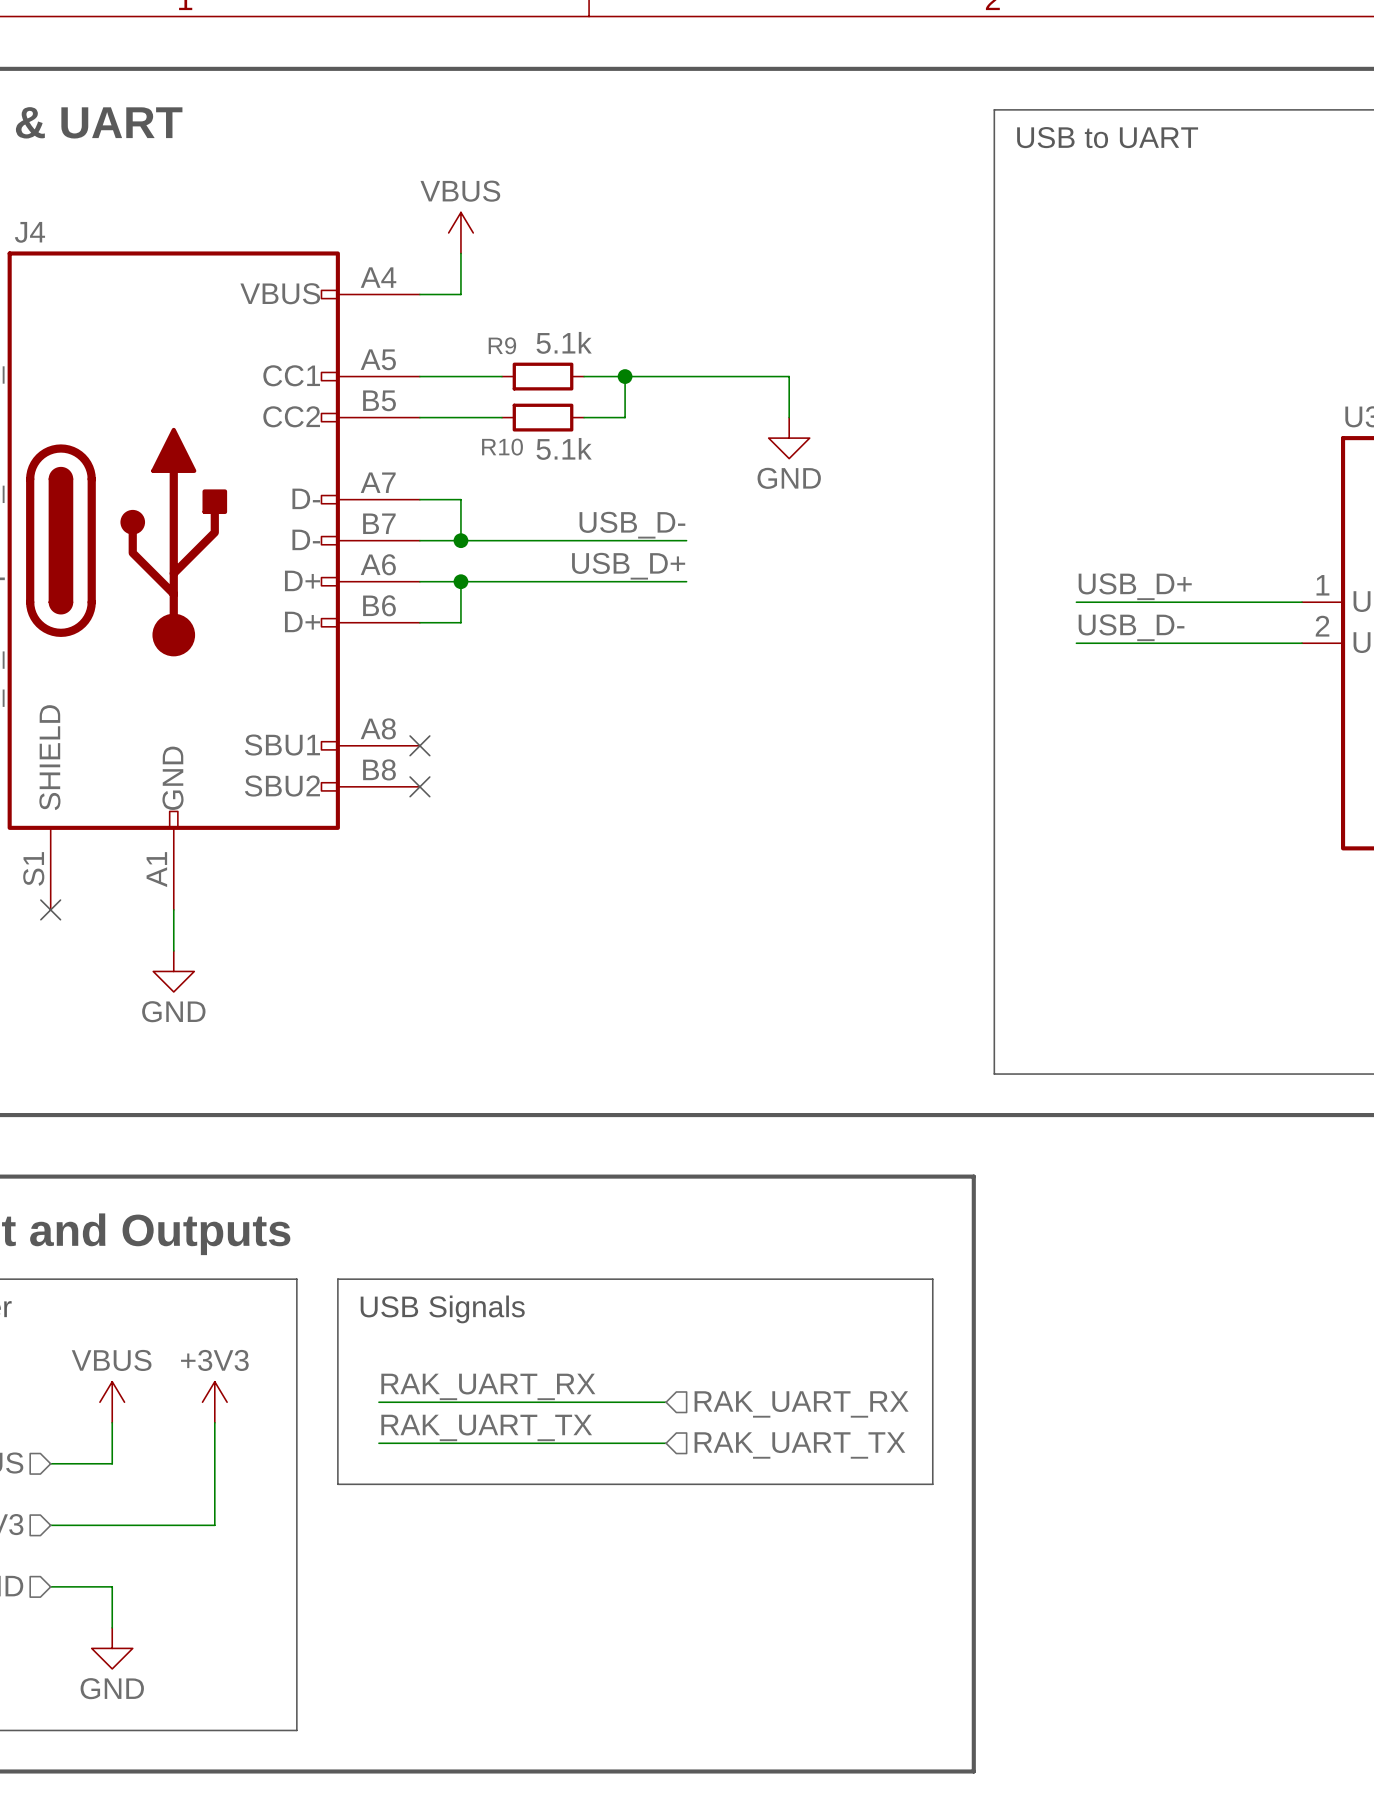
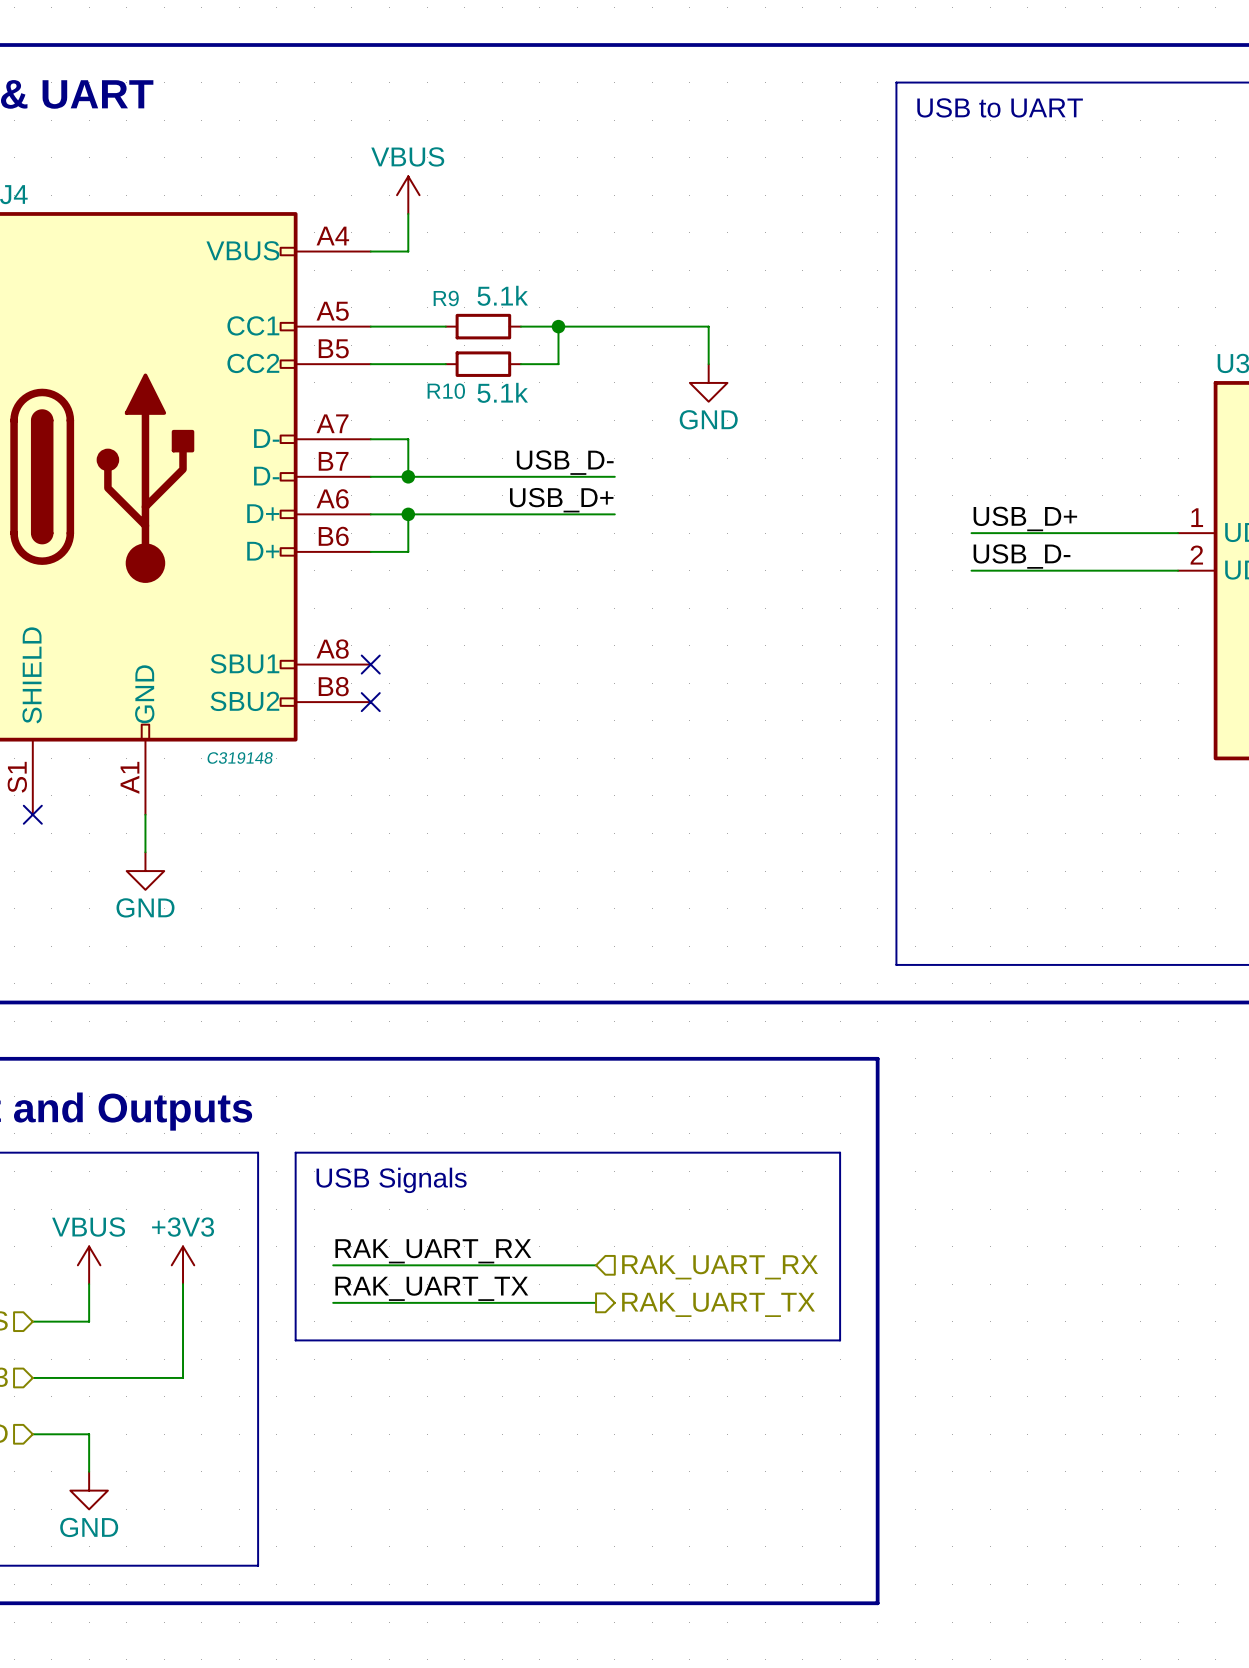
J4 text: none -> C319148 (240, 758)
hierarchical label shape: input (799, 1445) -> output (718, 1304)

